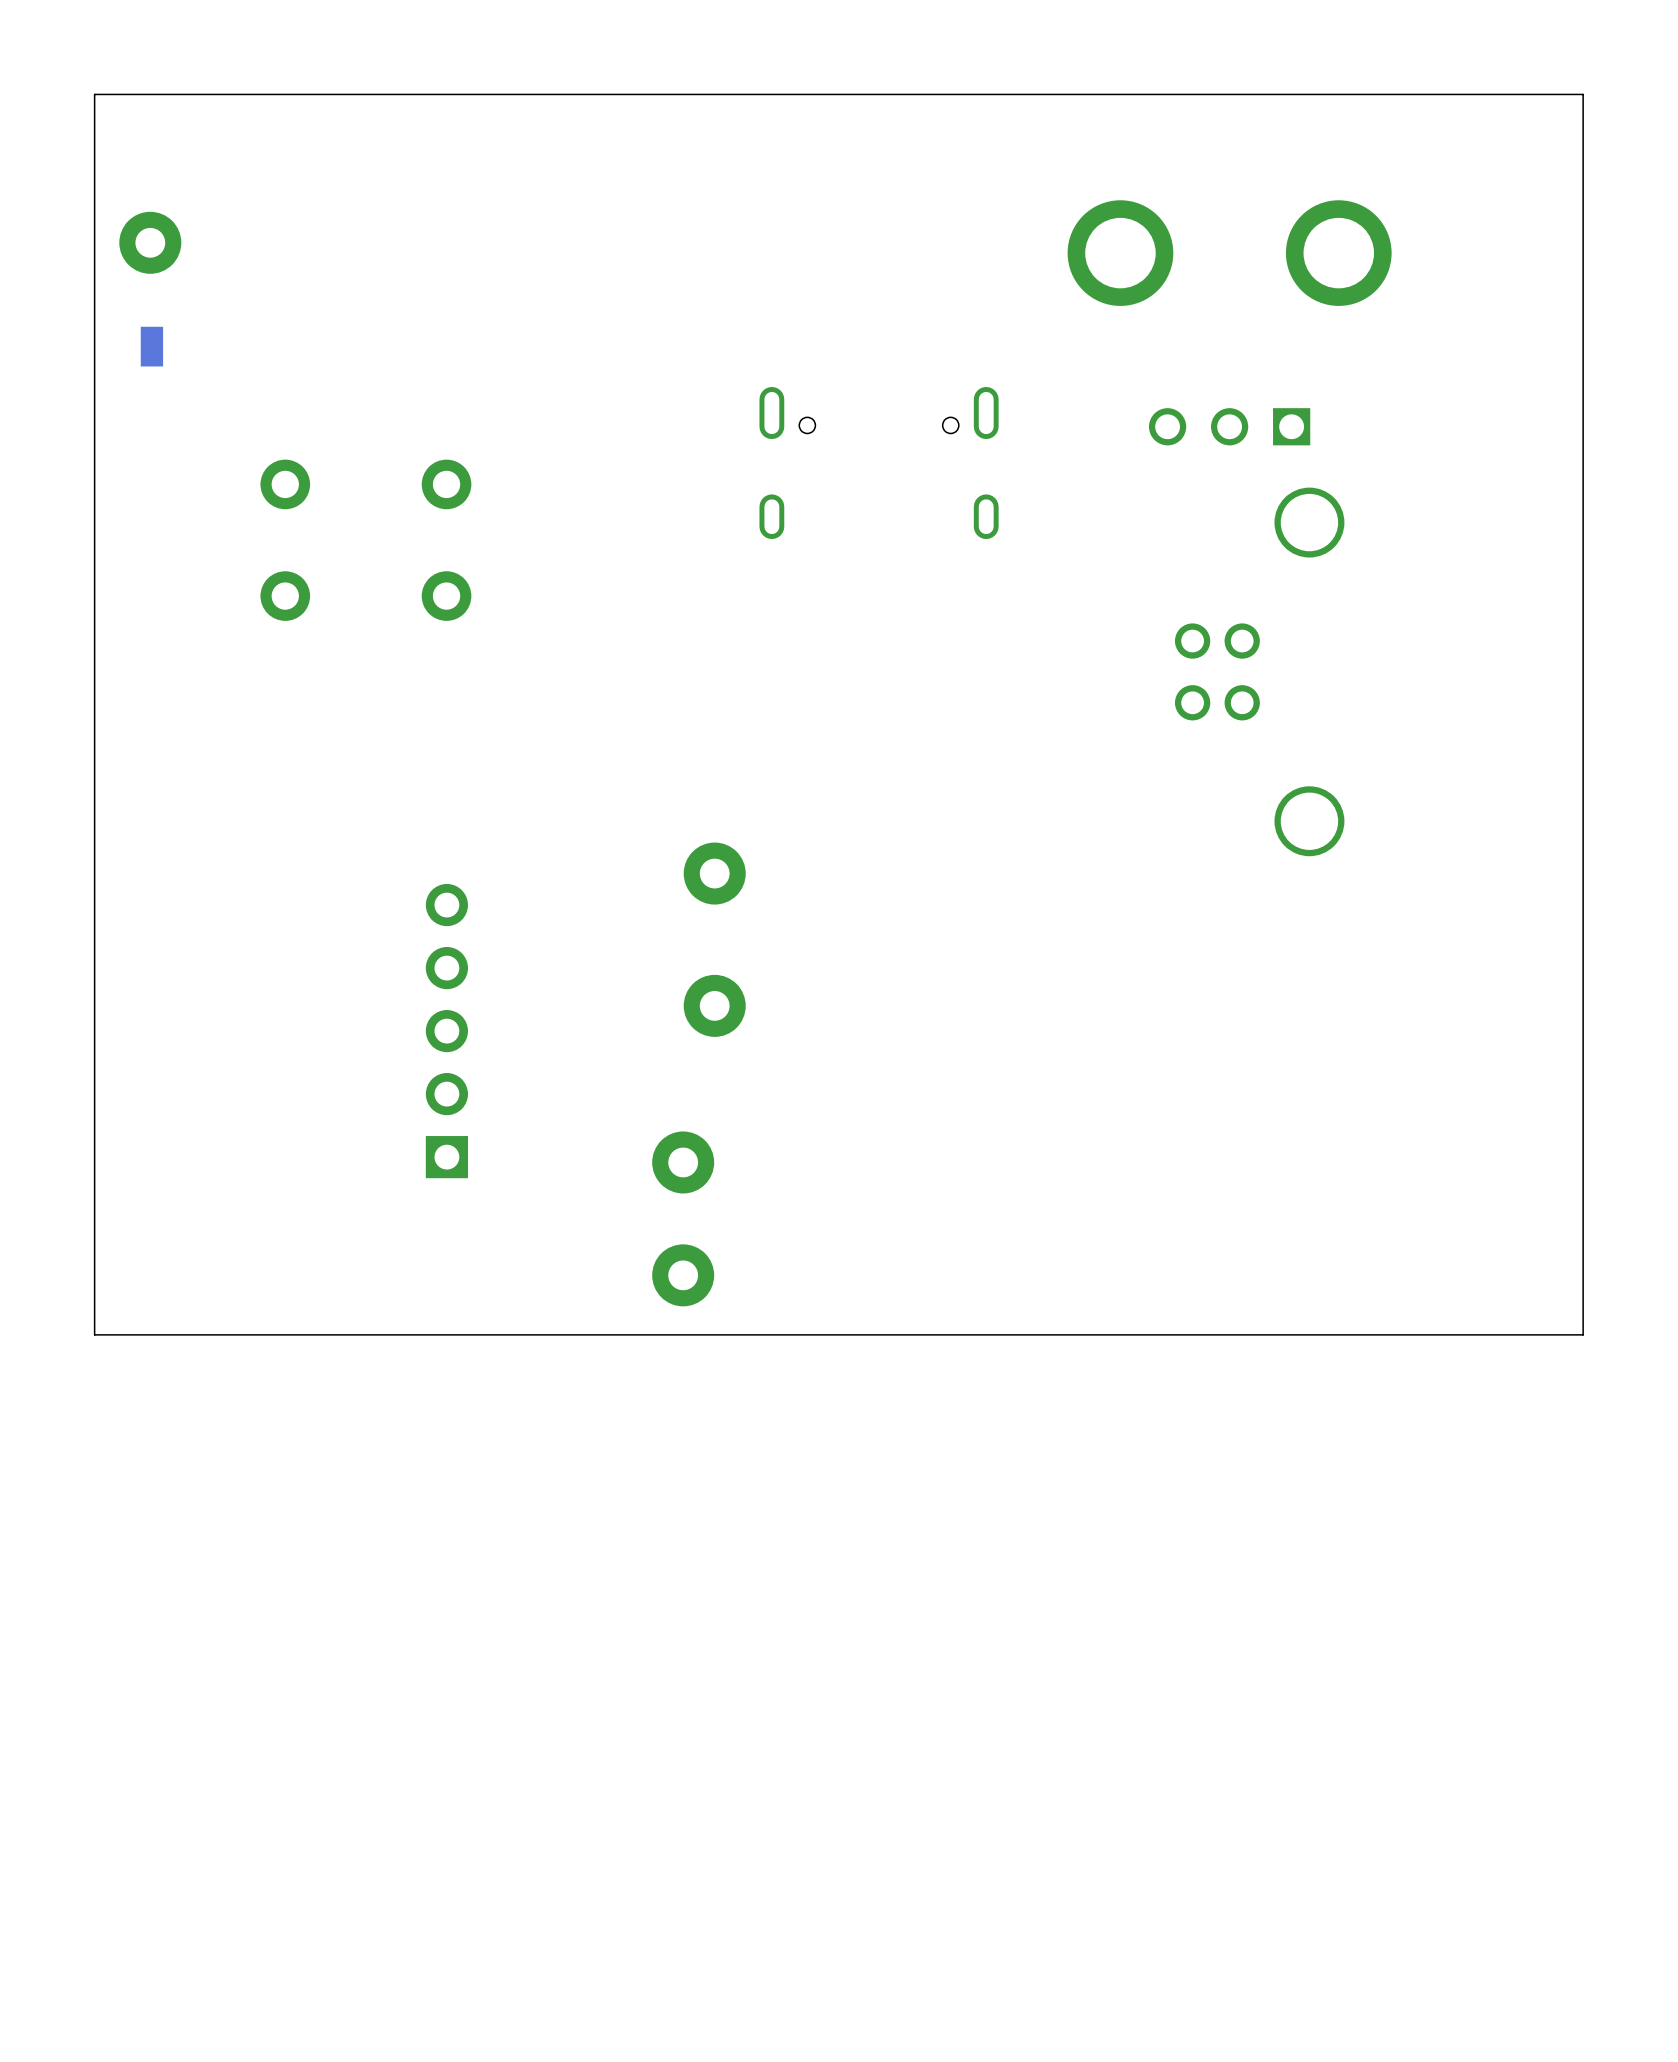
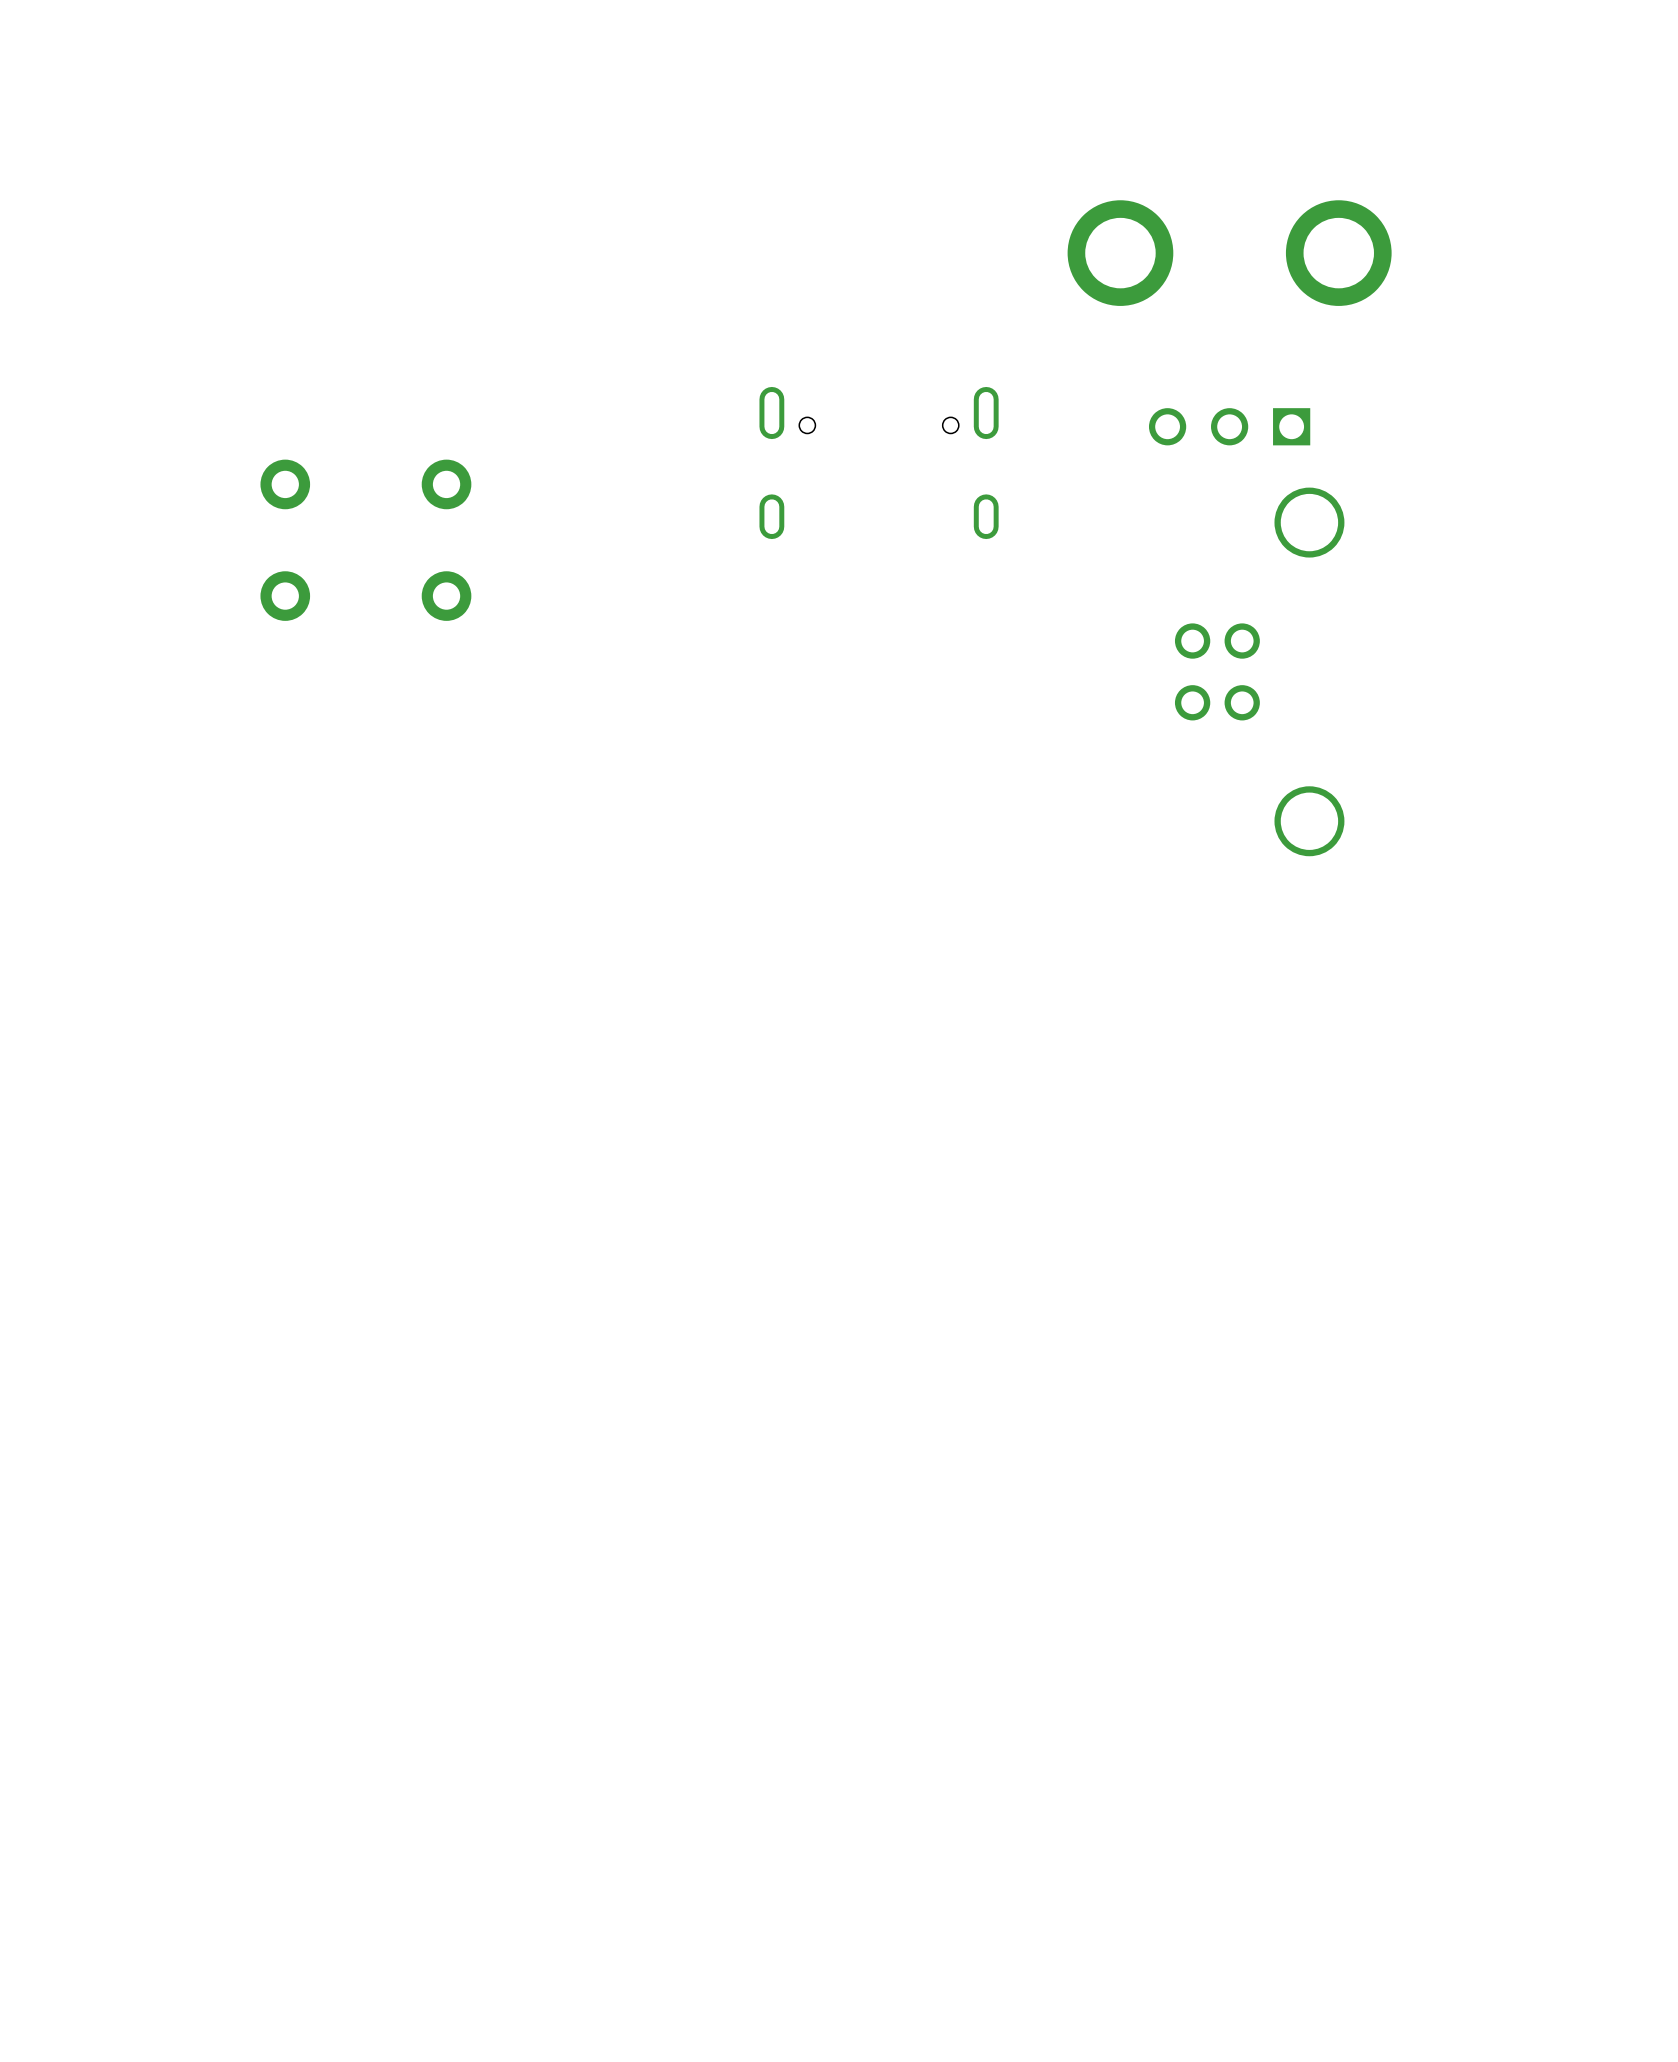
board edge: (1583, 94) (94, 94) (94, 1334) (1583, 1334) (1583, 94) -> none
part: (150, 242) -> none
part: (151, 346) -> none
part: (714, 873) -> none
part: (714, 1005) -> none
part: (446, 1031) -> none
part: (683, 1162) -> none
part: (683, 1275) -> none

